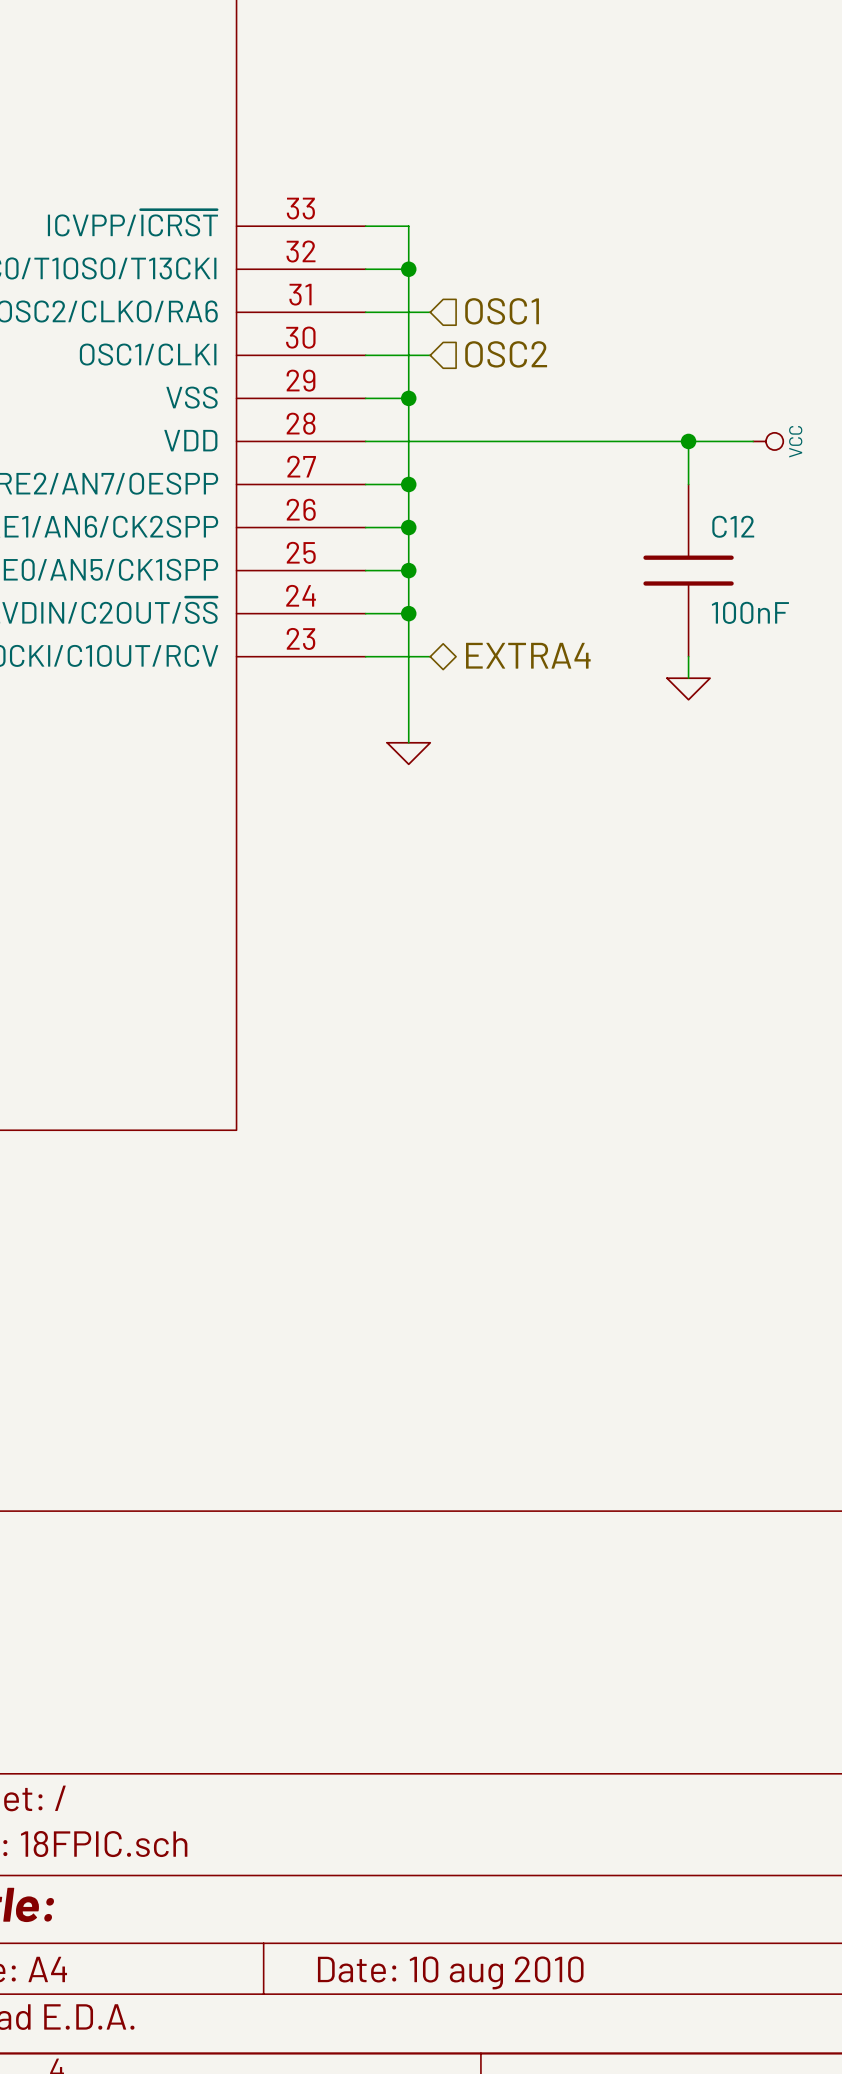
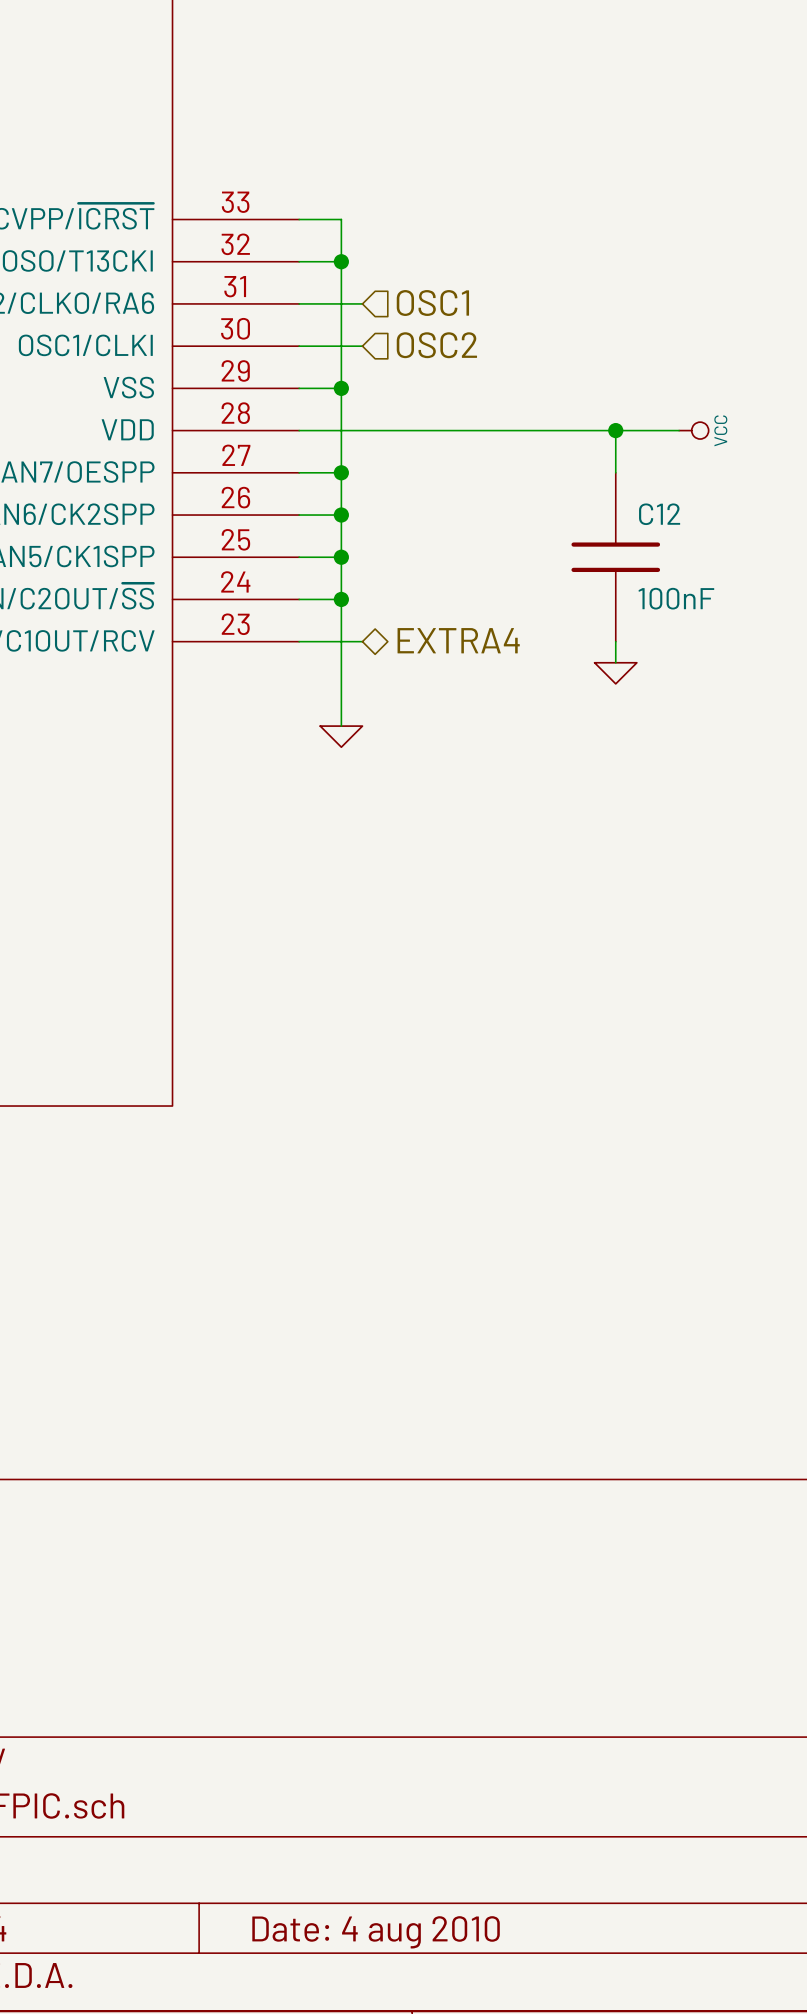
title block: Date: 10 aug 2010 (450, 1972) -> Date: 4 aug 2010 (376, 1932)

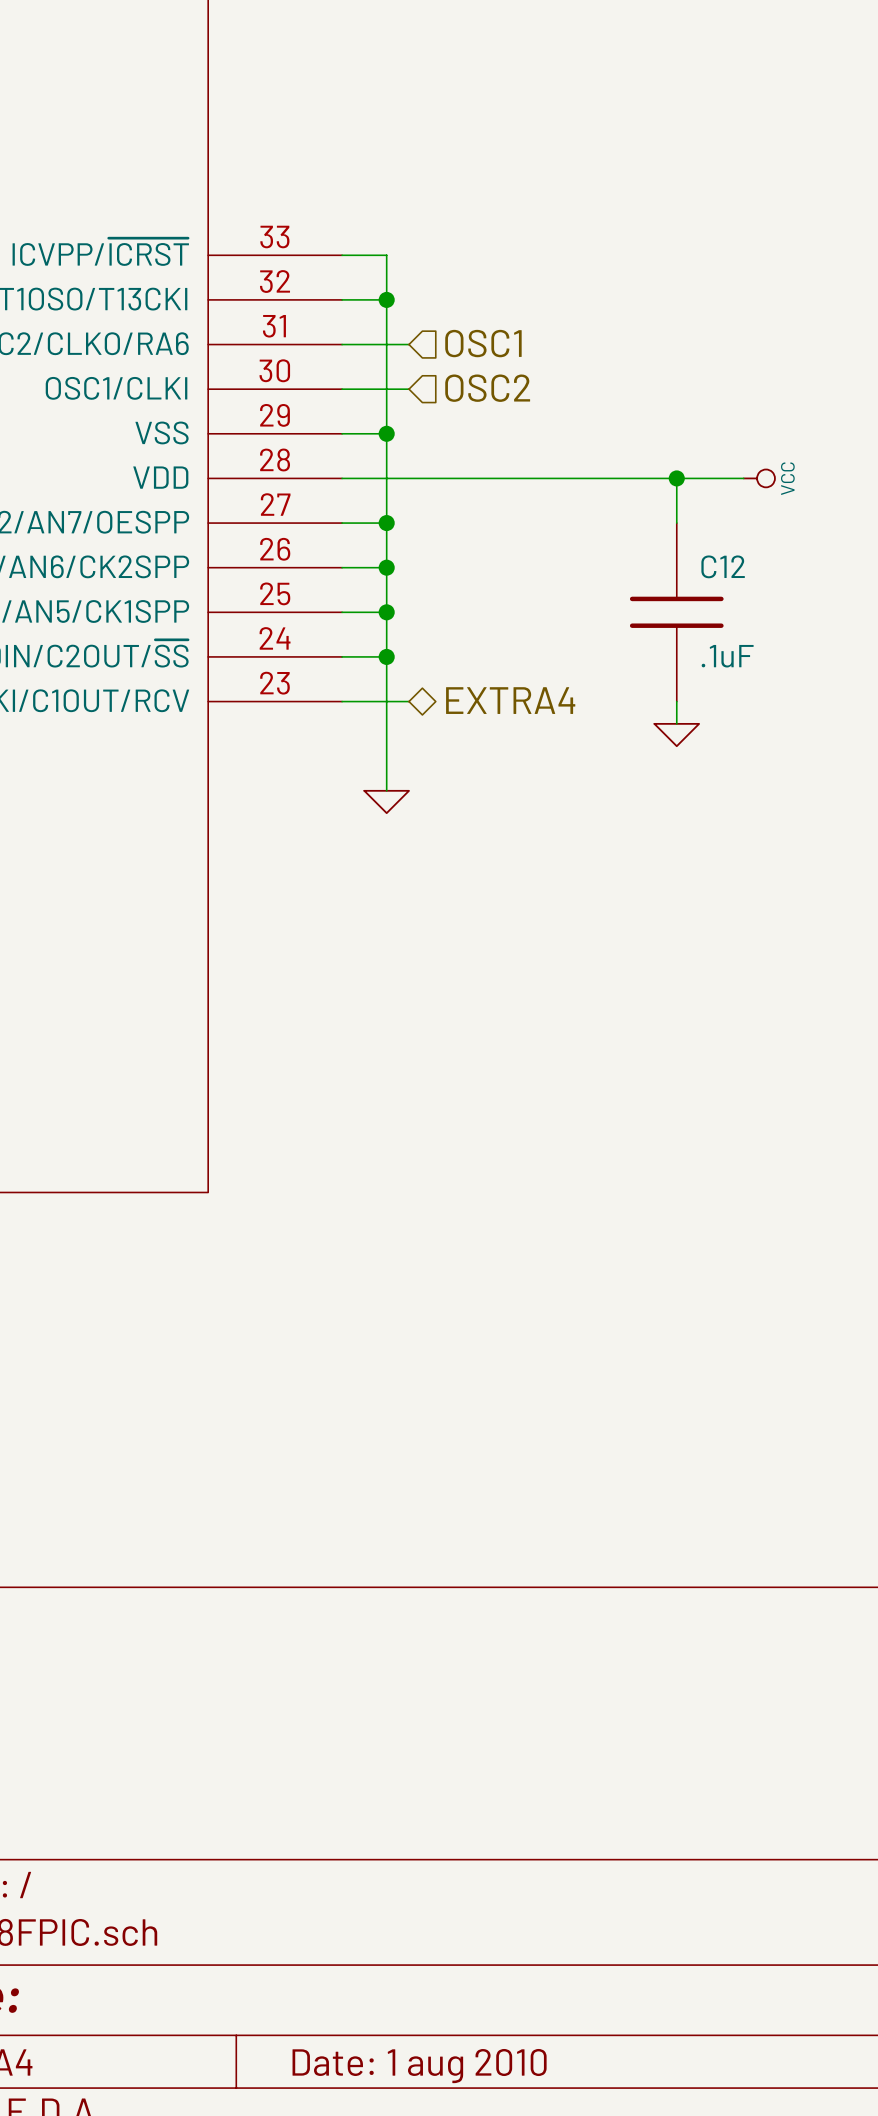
C12 value: 100nF (676, 598) -> .1uF (727, 656)
title block: Date: 4 aug 2010 (376, 1932) -> Date: 1 aug 2010 (419, 2066)

